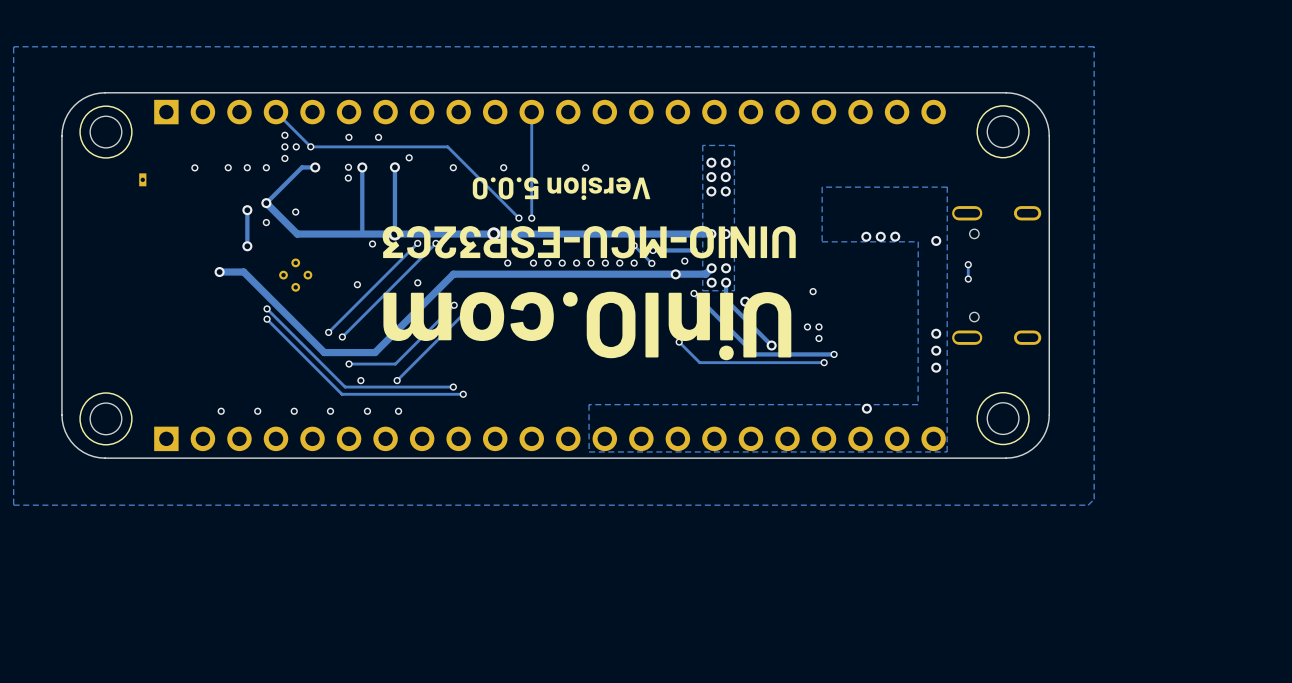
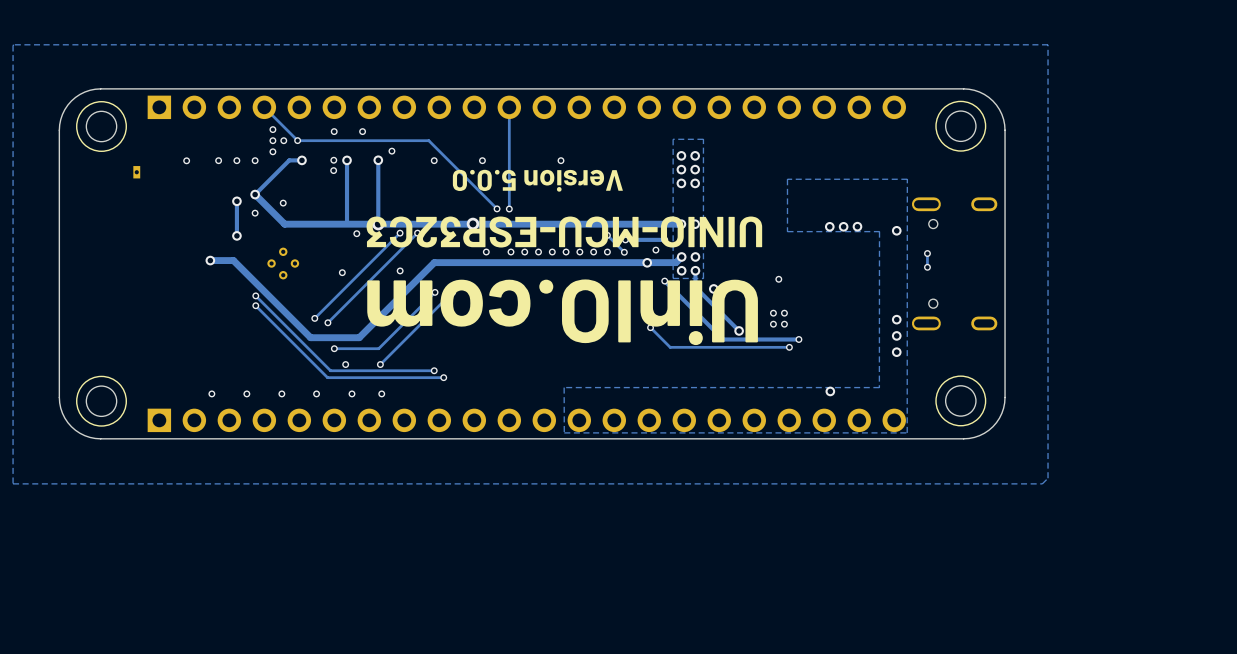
via: none -> (773, 324)

